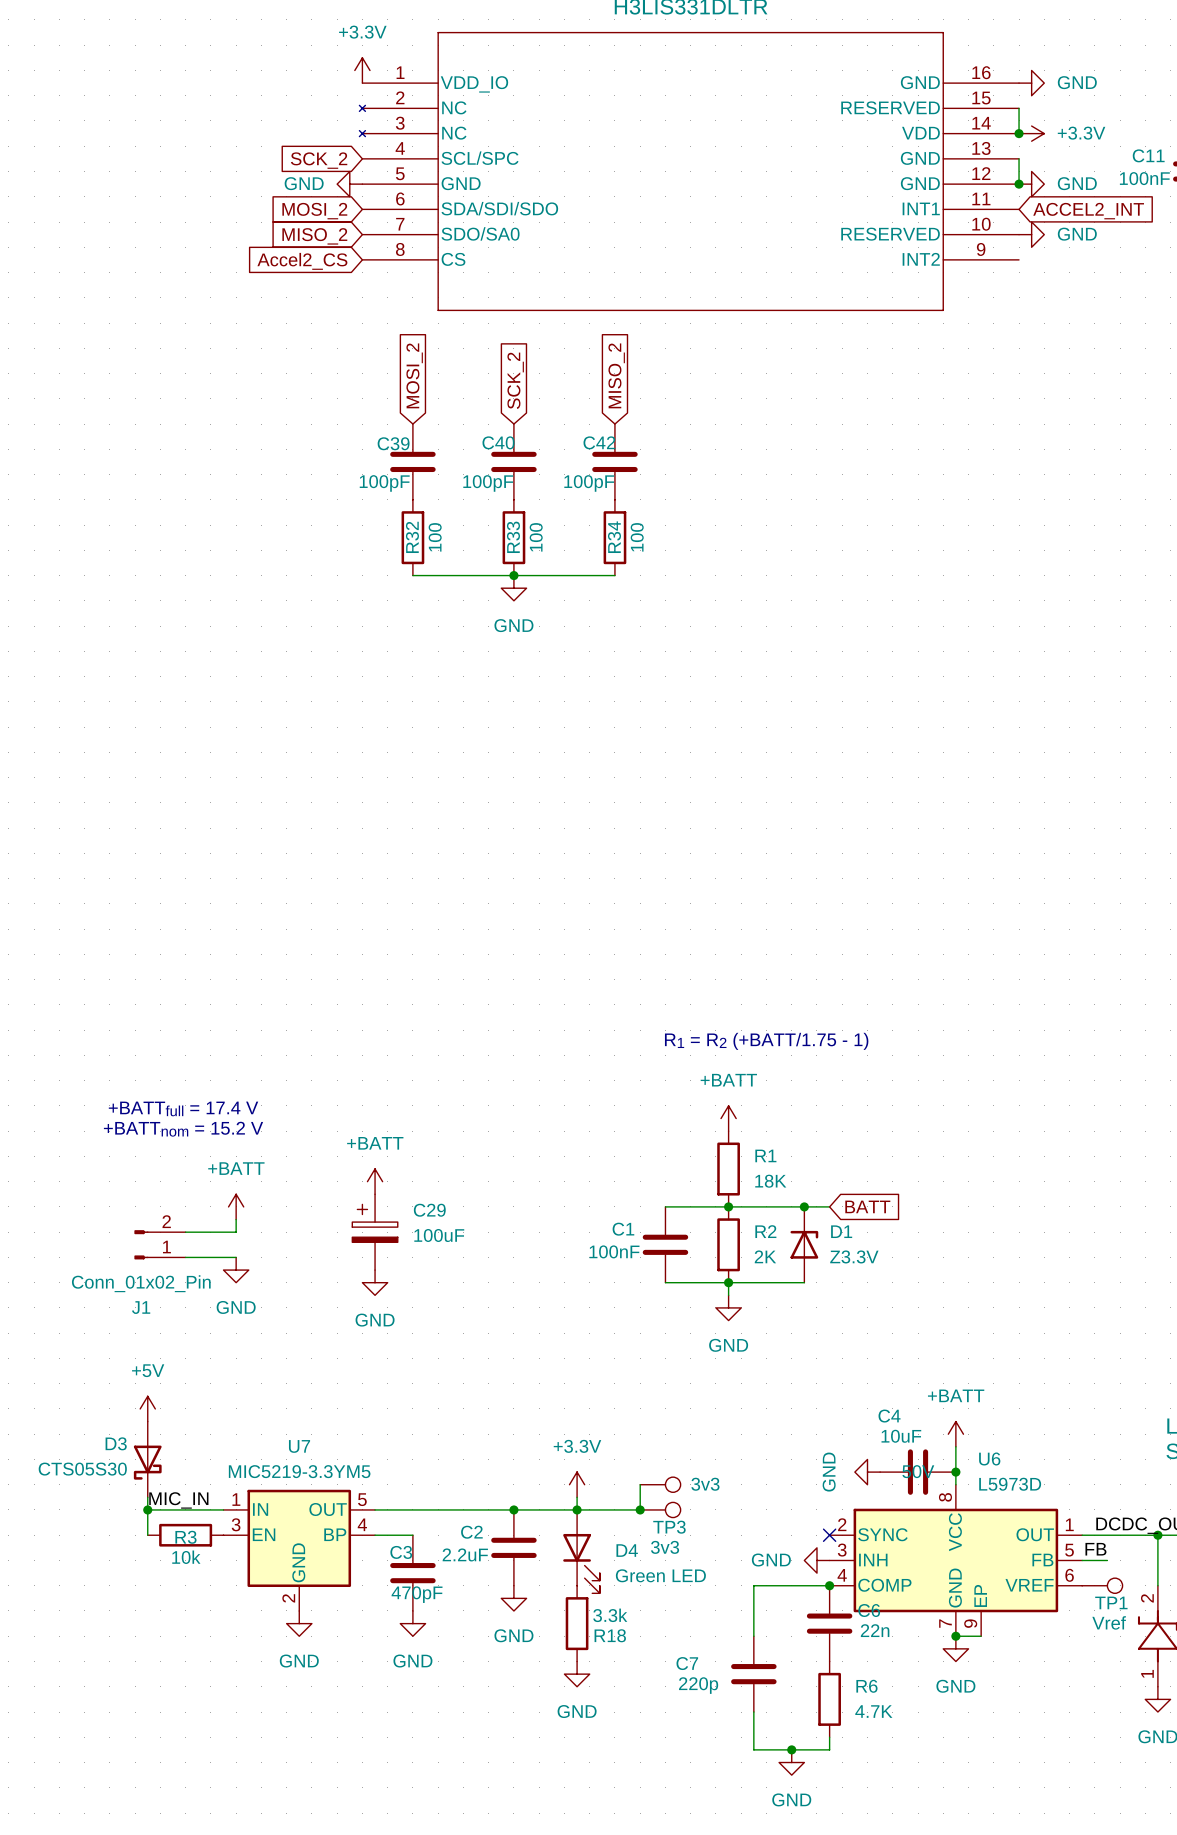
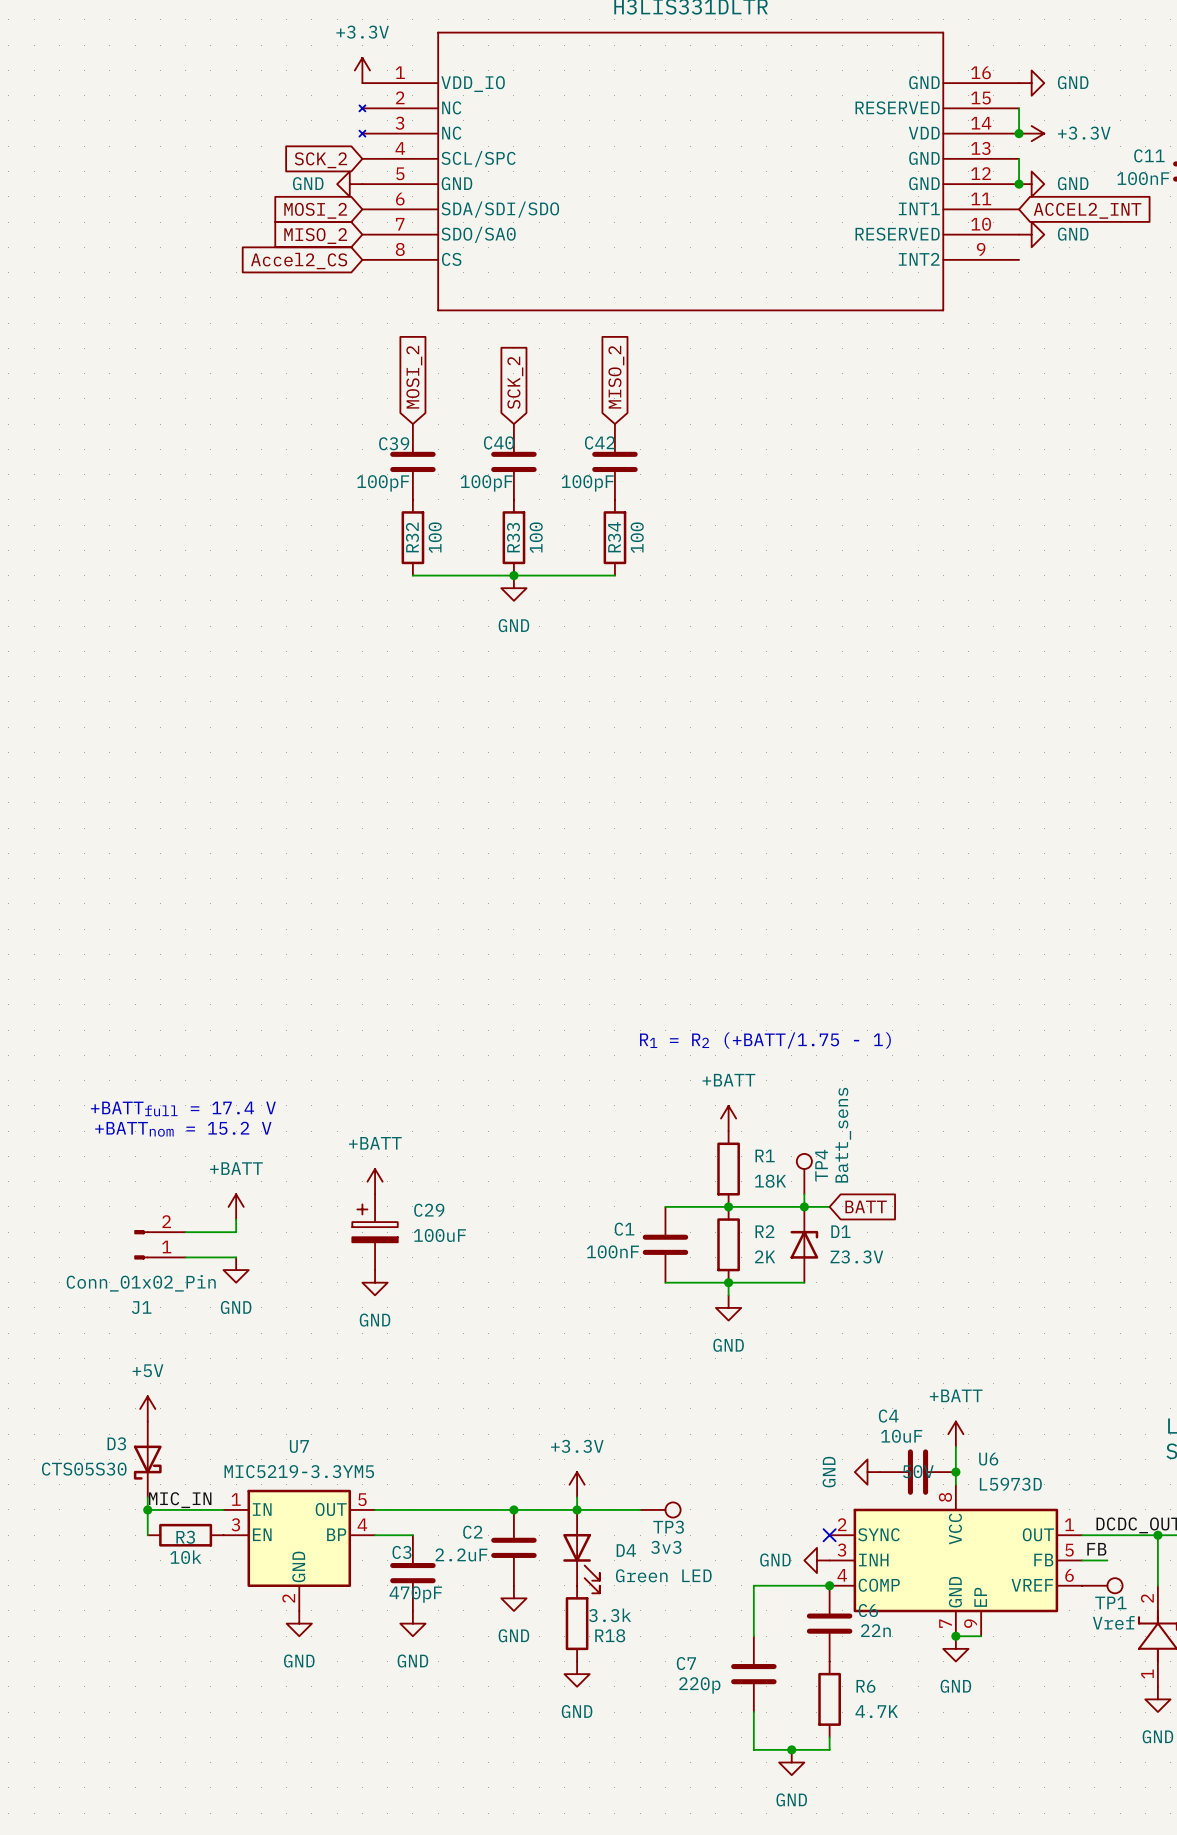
TP4: none -> Batt_sens (804, 1174)
wire: none -> (804, 1194) (804, 1206)
wire: (640, 1484) (640, 1509) -> none
part: 3v3 (660, 1484) -> none
junction: (640, 1509) -> none

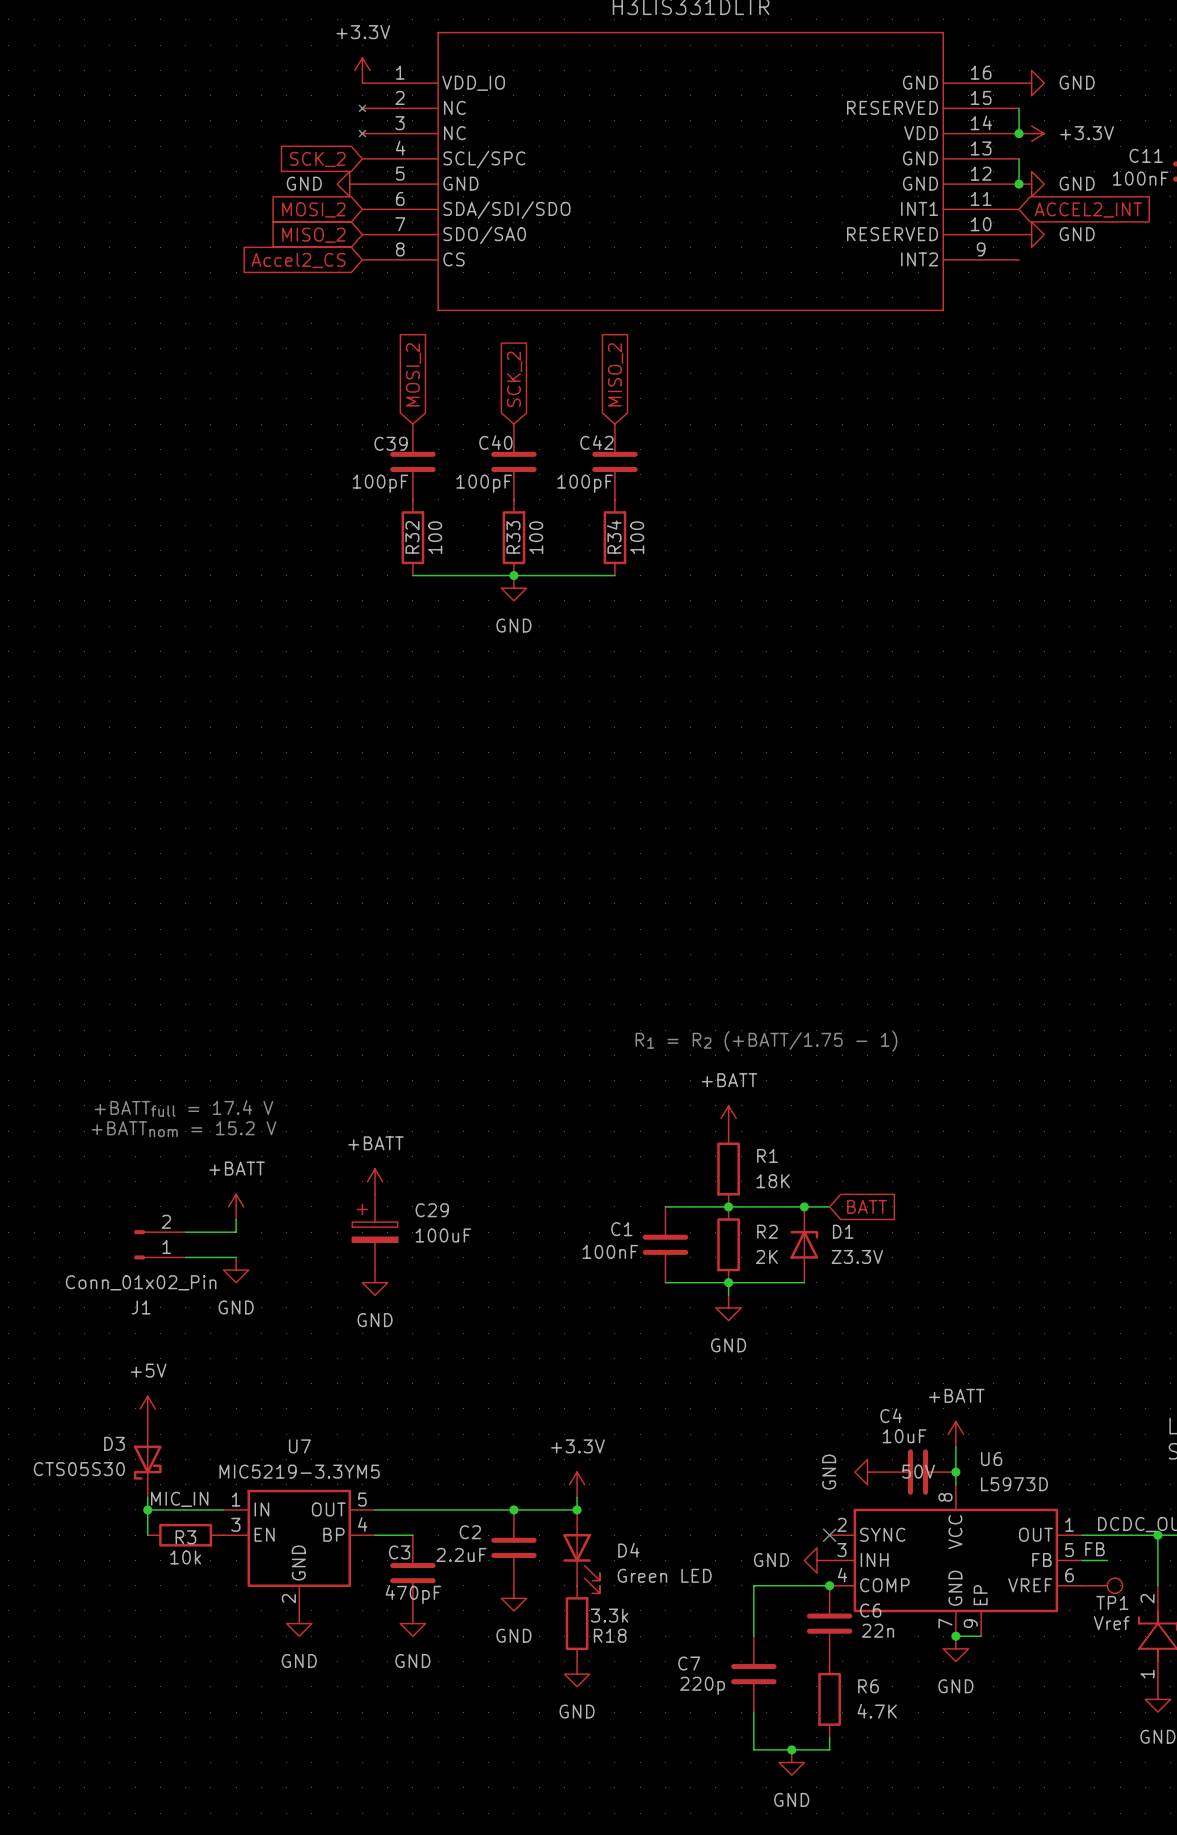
TP4: Batt_sens (804, 1174) -> none
wire: (804, 1194) (804, 1206) -> none
wire: (577, 1509) (640, 1509) -> none
TP3: 3v3 (660, 1509) -> none

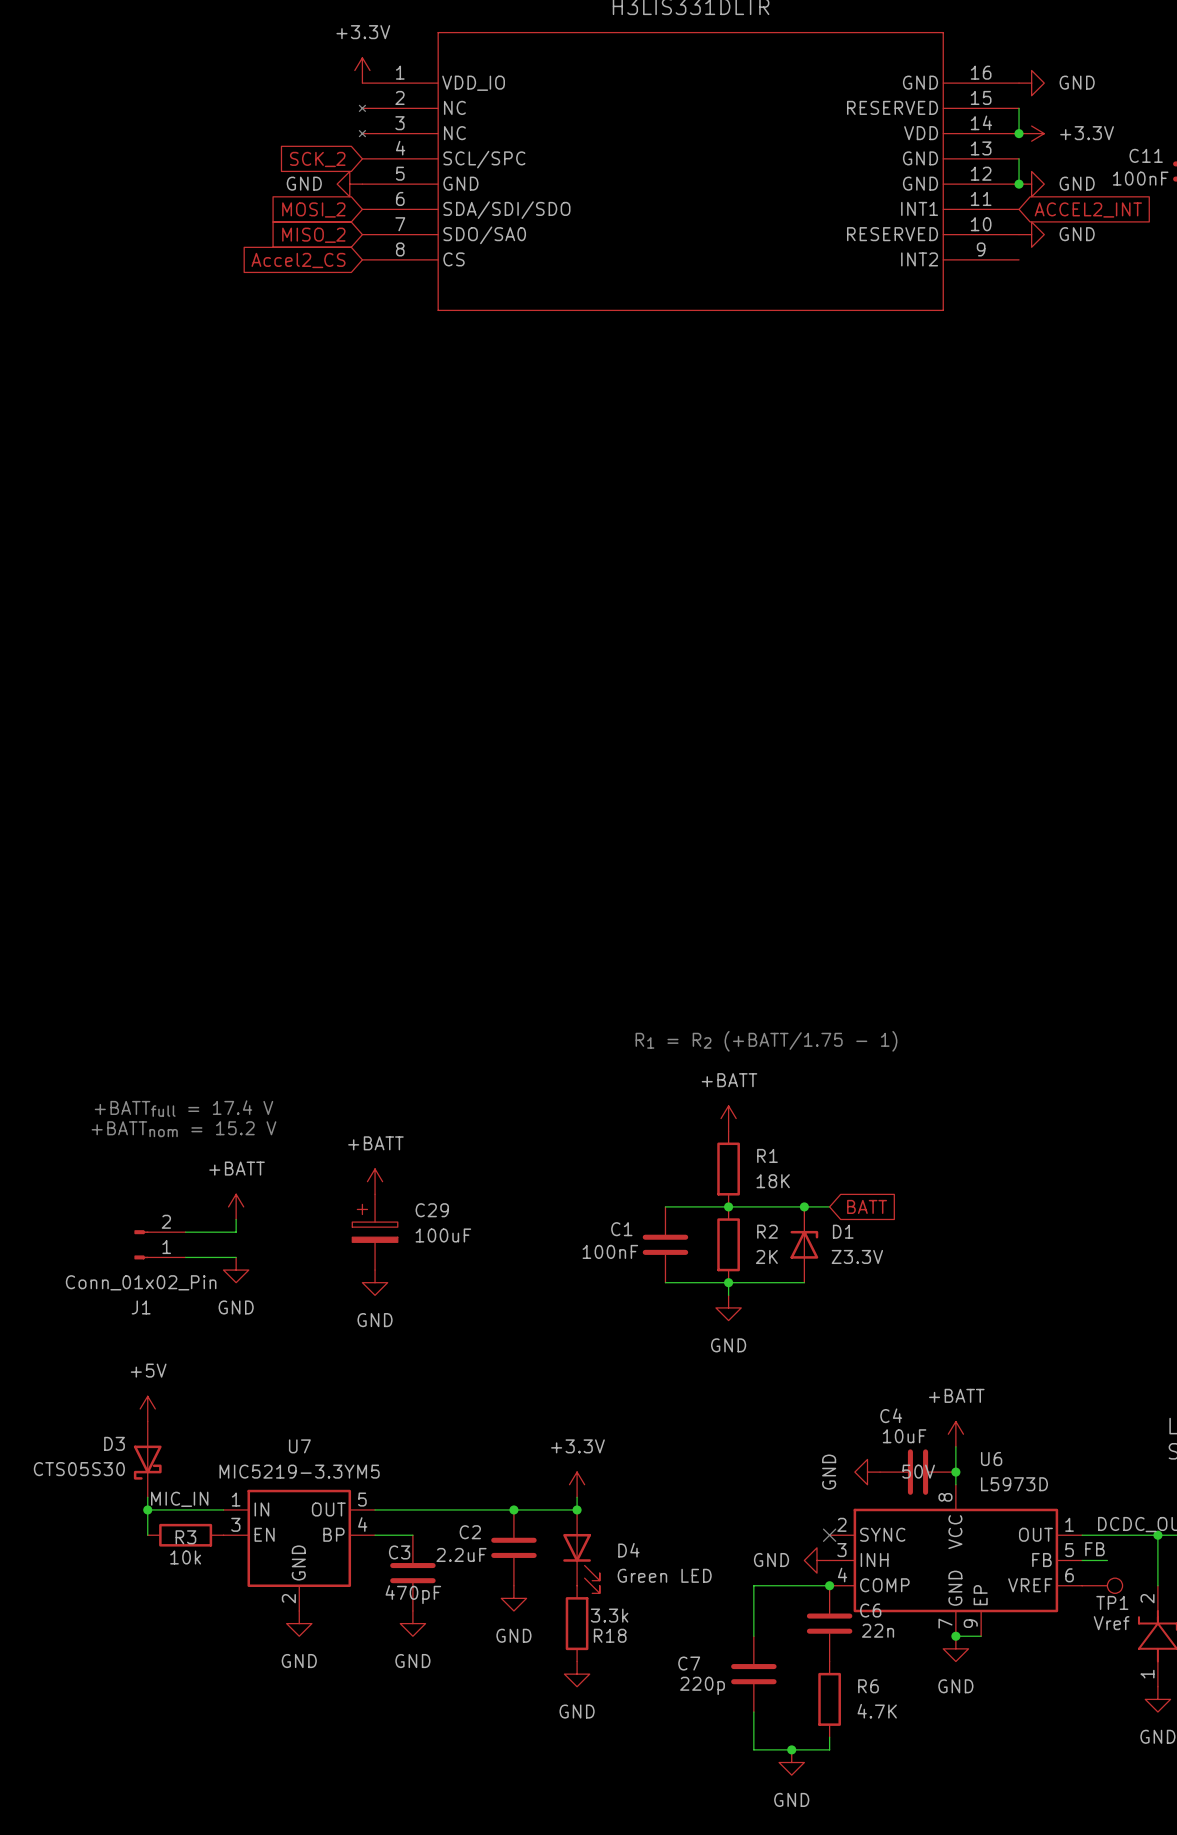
global label: MOSI_2 (413, 374) -> none
global label: MISO_2 (615, 374) -> none
global label: SCK_2 (514, 379) -> none
C39: 100pF (412, 461) -> none
C40: 100pF (513, 461) -> none
C42: 100pF (614, 461) -> none
R32: 100 (412, 537) -> none
R33: 100 (513, 537) -> none
R34: 100 (614, 537) -> none
wire: (412, 575) (614, 575) -> none
junction: (513, 575) -> none
power symbol: GND (513, 588) -> none

